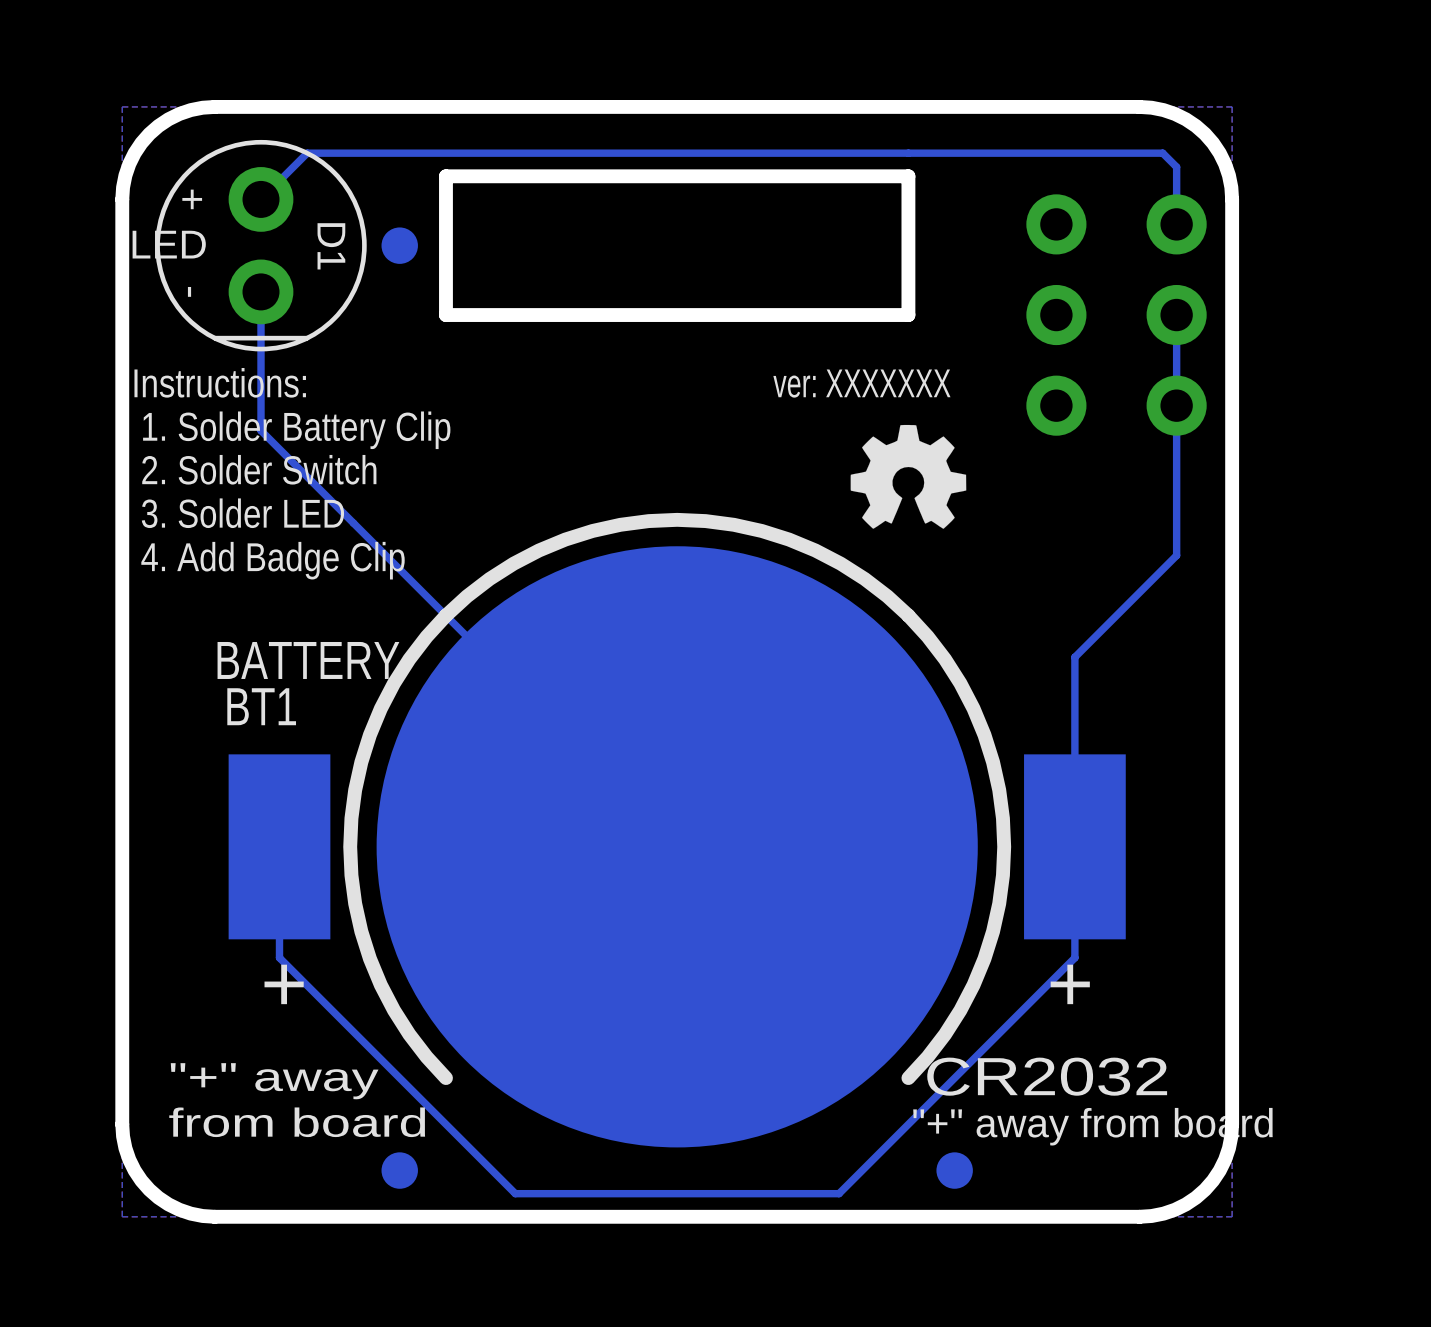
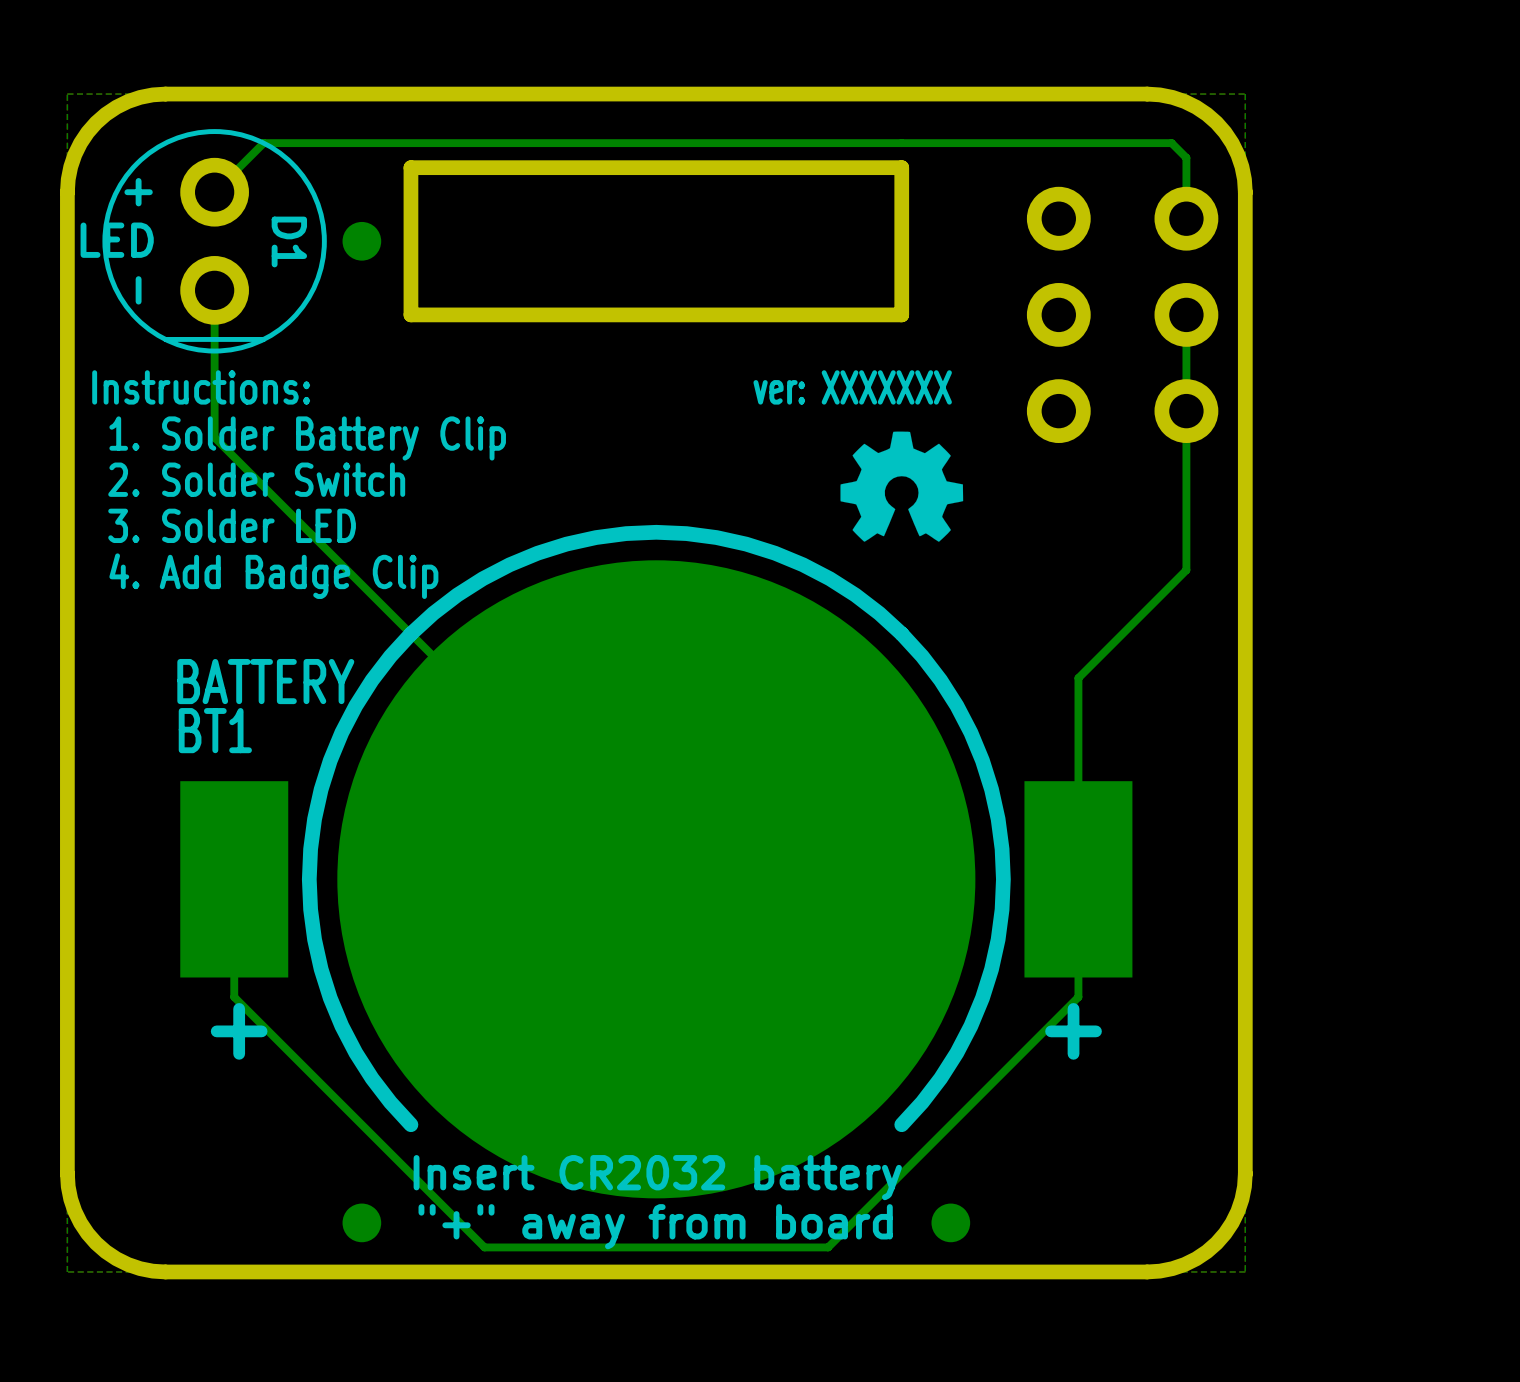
BT1 text: CR2032 (1047, 1076) -> none
text: "+" away (274, 1081) -> none
text: from board (297, 1122) -> none
BT1 text: none -> Insert CR2032 battery (657, 1177)
BT1 text position: "+" away from board (1092, 1126) -> "+" away from board (655, 1226)

